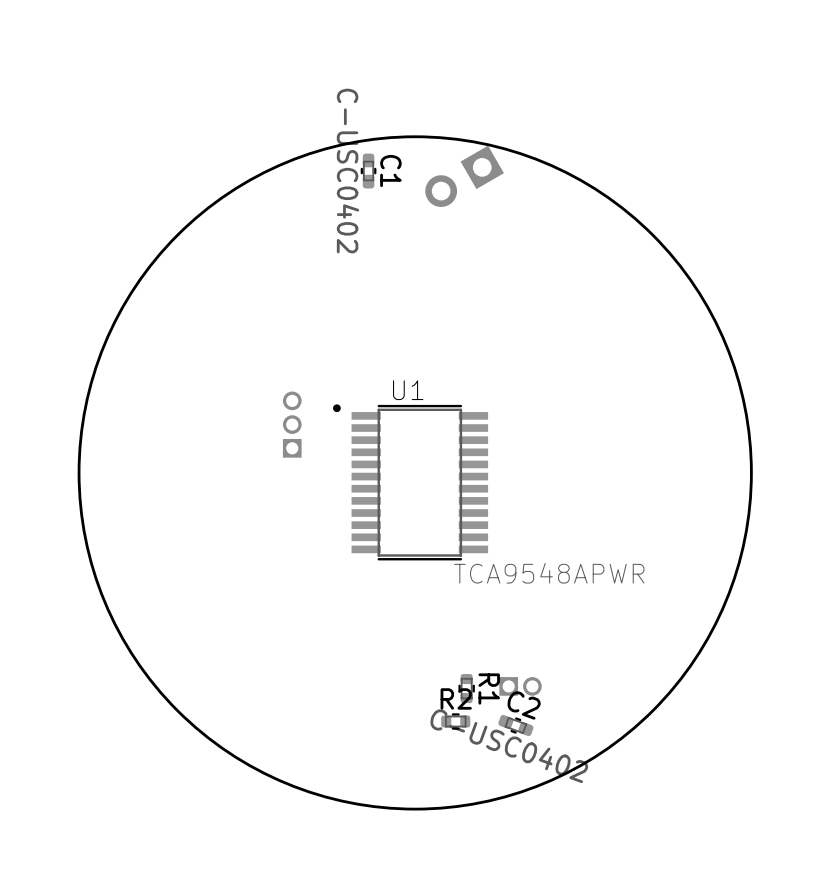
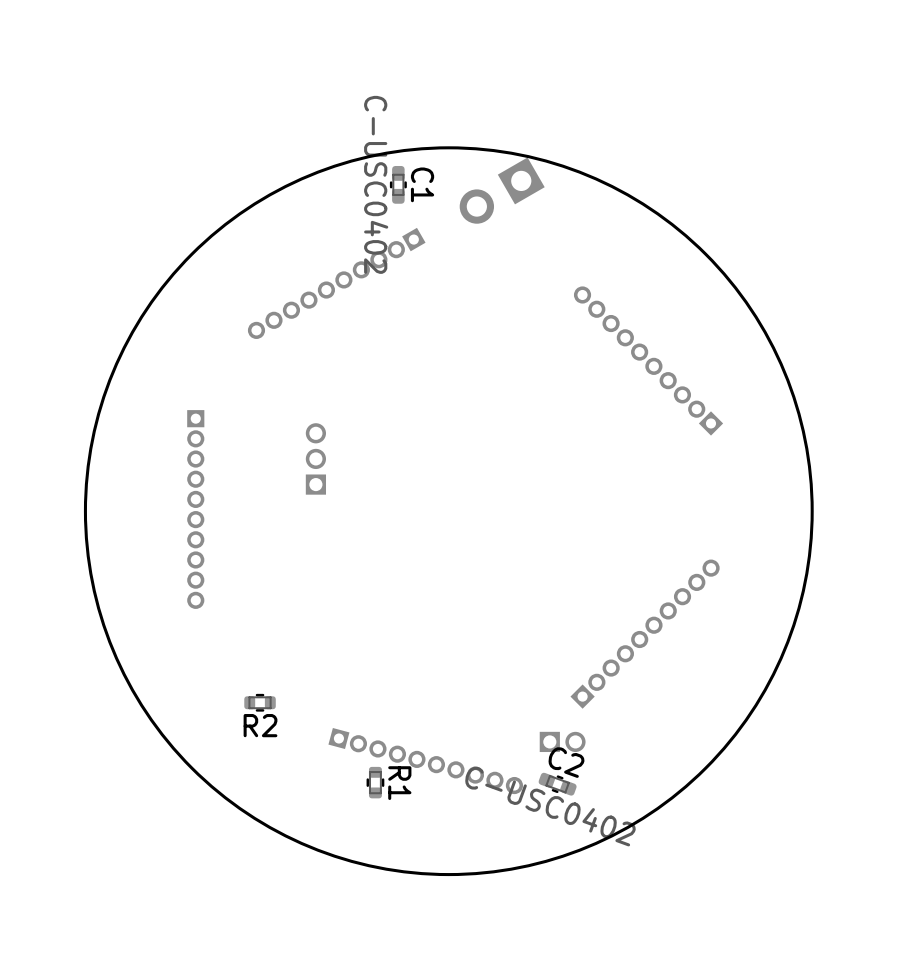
part: none -> (336, 283)
part: none -> (648, 361)
part: none -> (195, 509)
U1: TCA9548APWR (410, 482) -> none
part: none -> (645, 634)
R1 position: (466, 688) -> (375, 782)
R2 name position: R2 (456, 698) -> R2 (260, 725)
part: none -> (425, 761)
R2 position: (455, 721) -> (260, 702)

